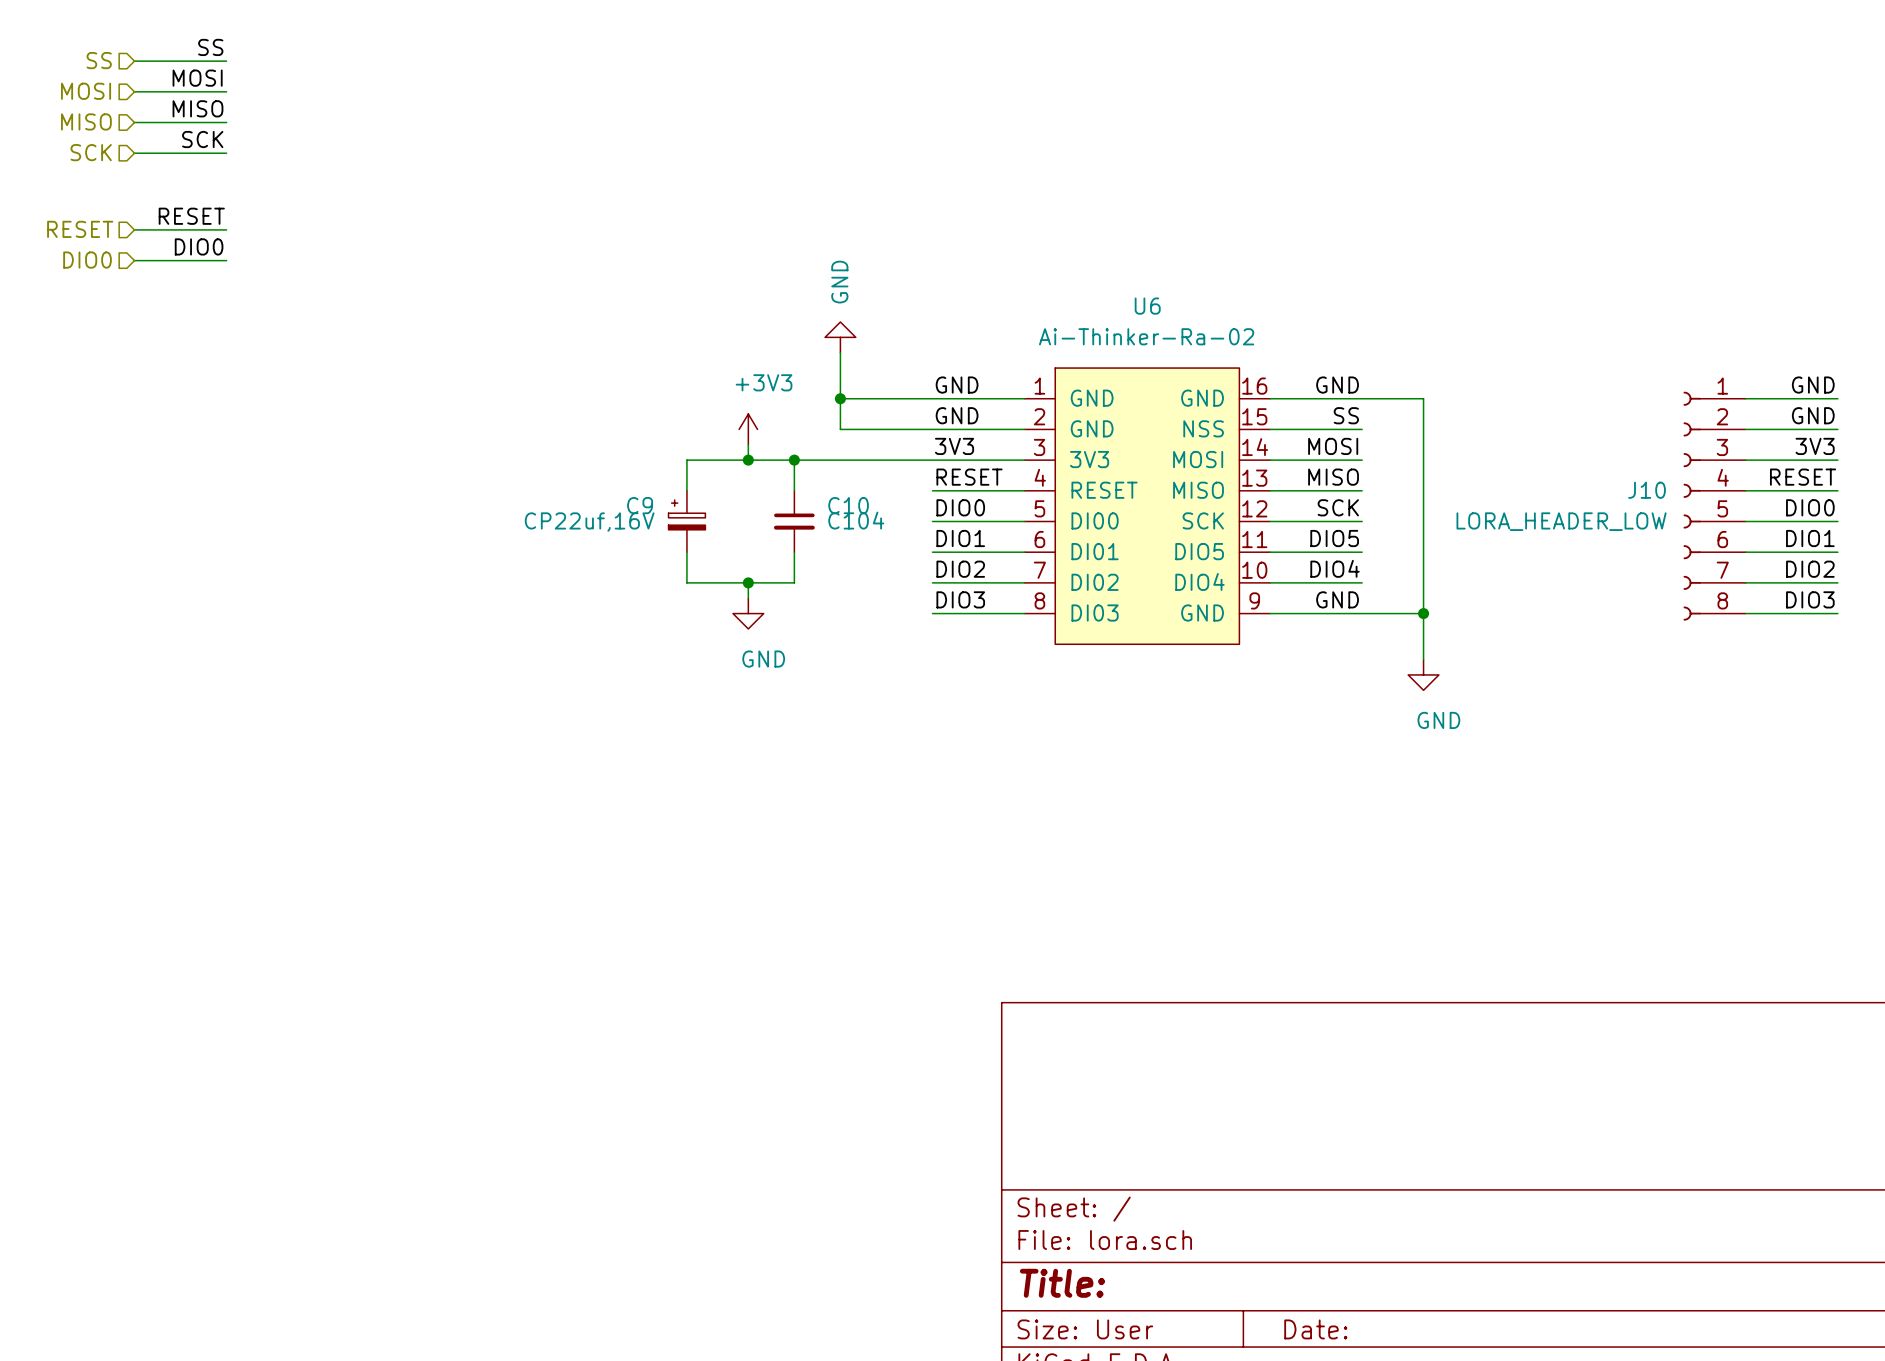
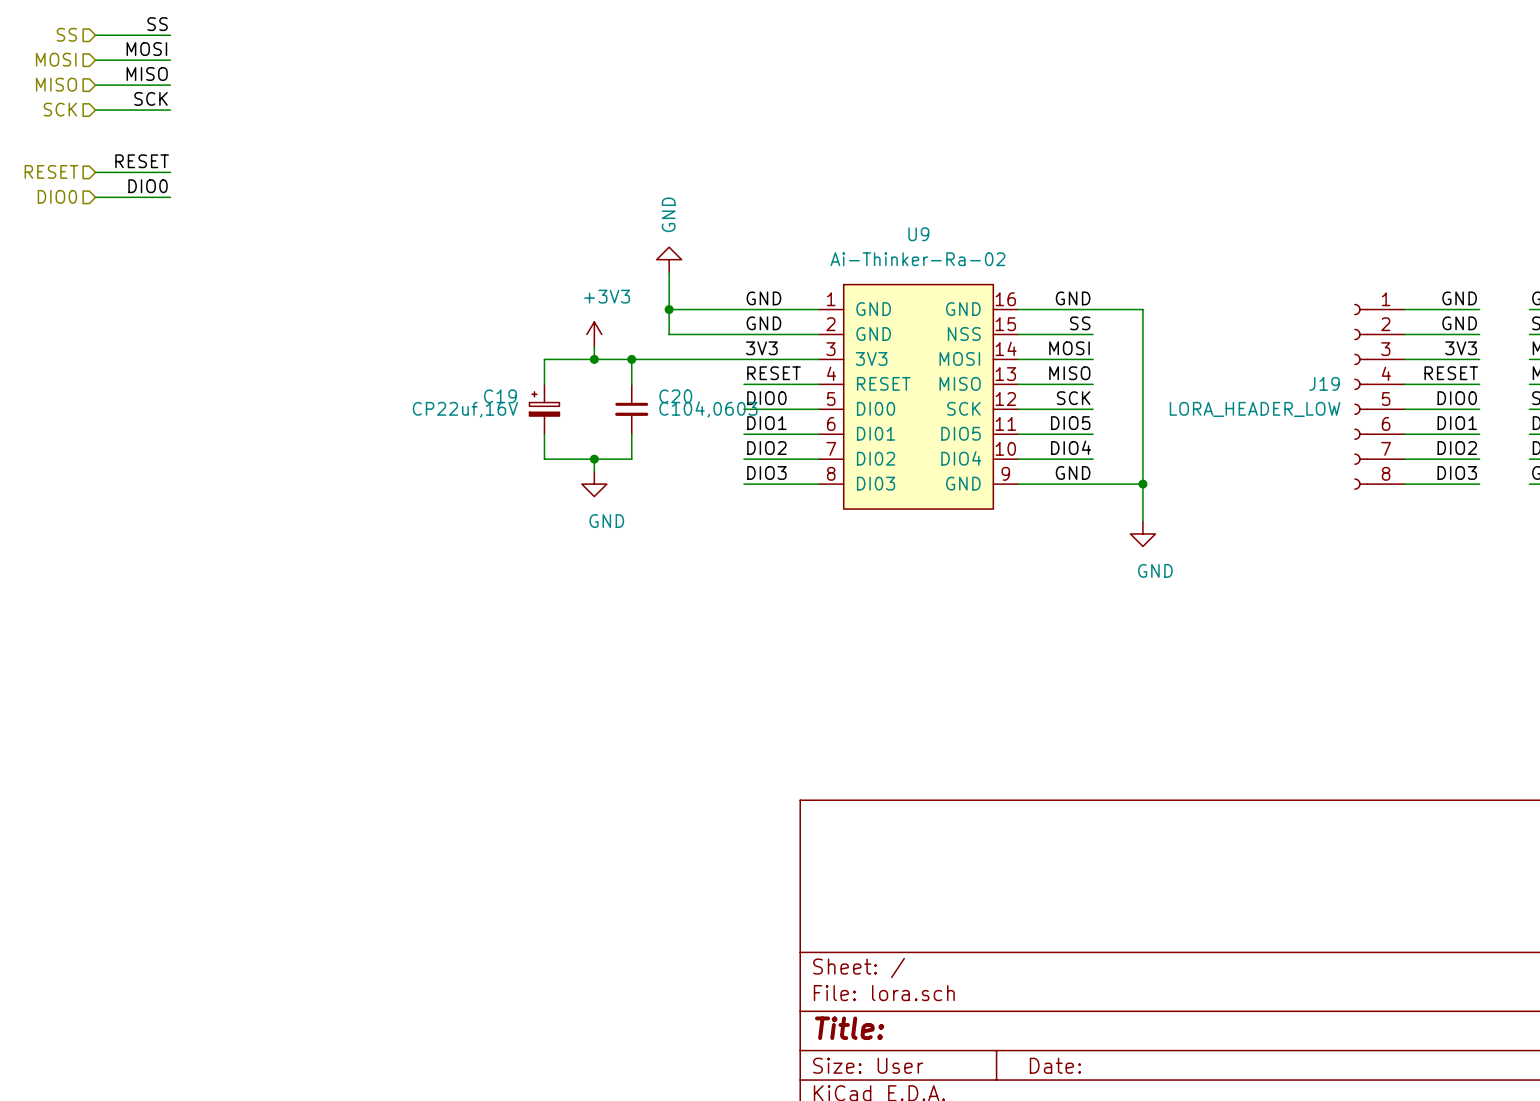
U6 name: U6 (1147, 306) -> U9 (918, 234)
J10 name: J10 (1647, 490) -> J19 (1324, 383)
C9 name: C9 (640, 505) -> C19 (500, 396)
C10 name: C10 (848, 505) -> C20 (675, 396)
C10 value: C104 (856, 520) -> C104,0603 (708, 409)

